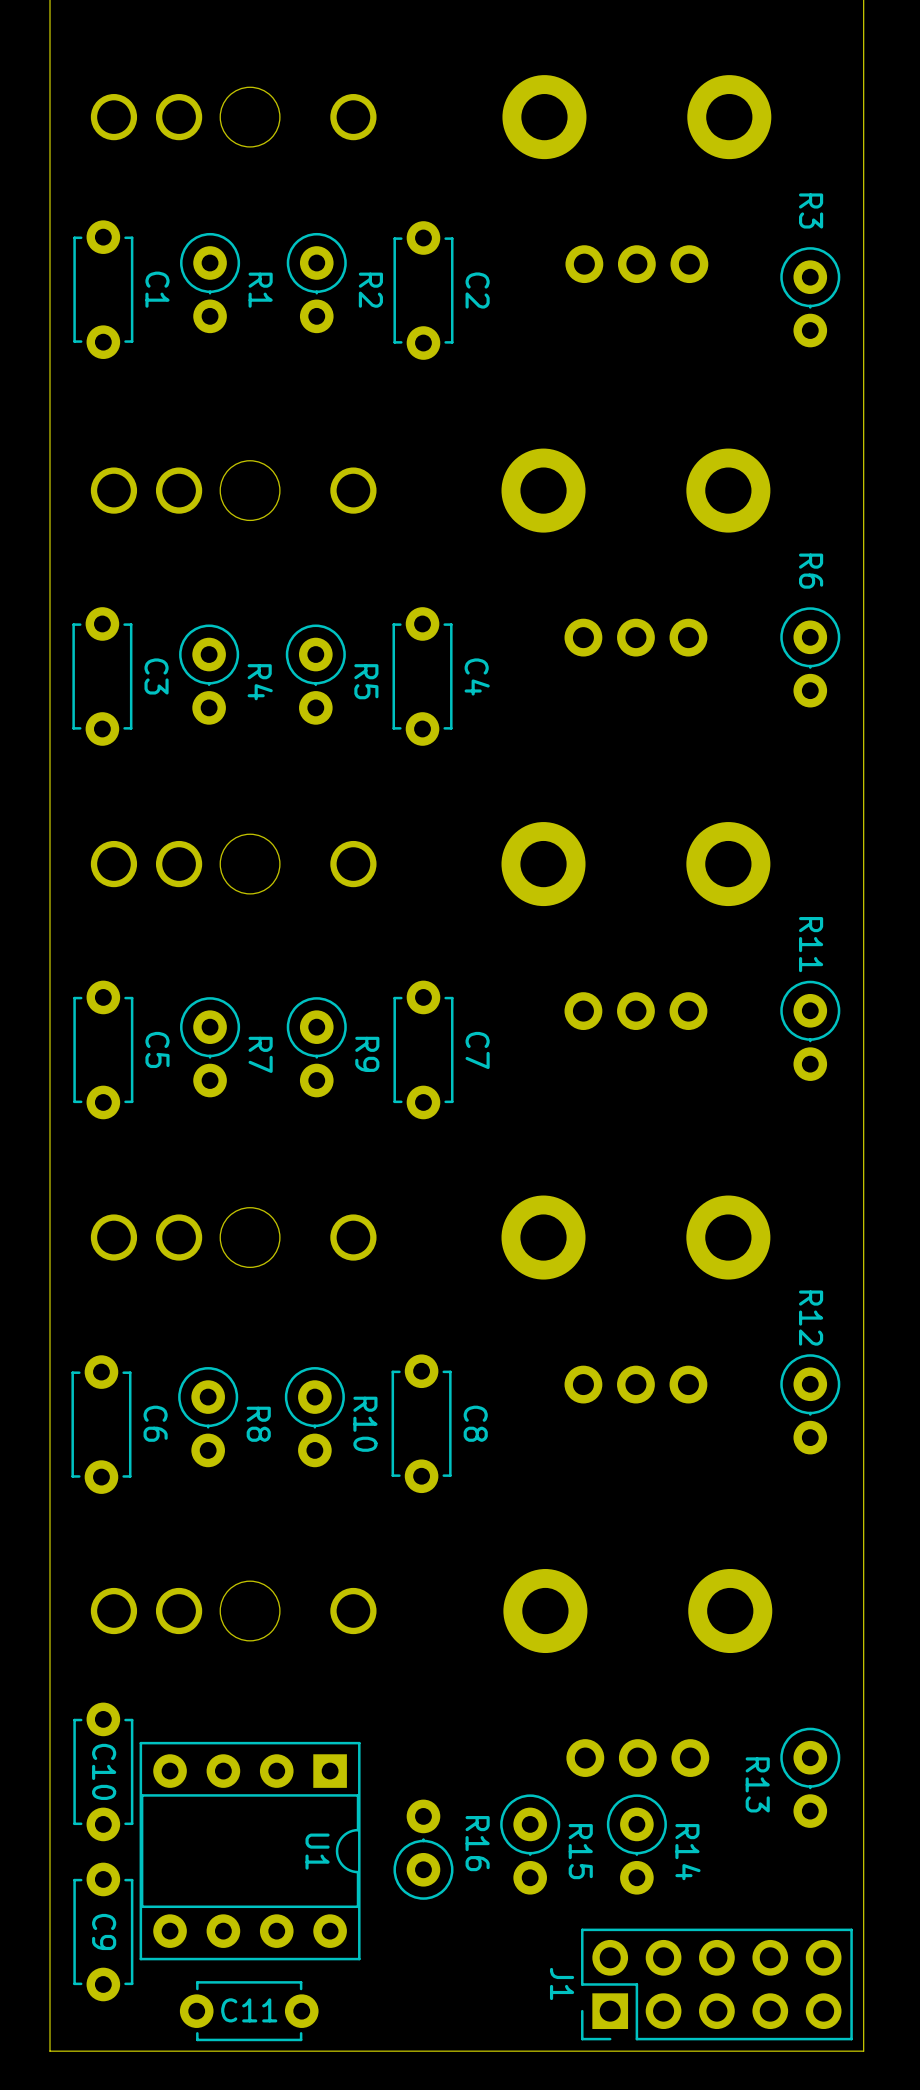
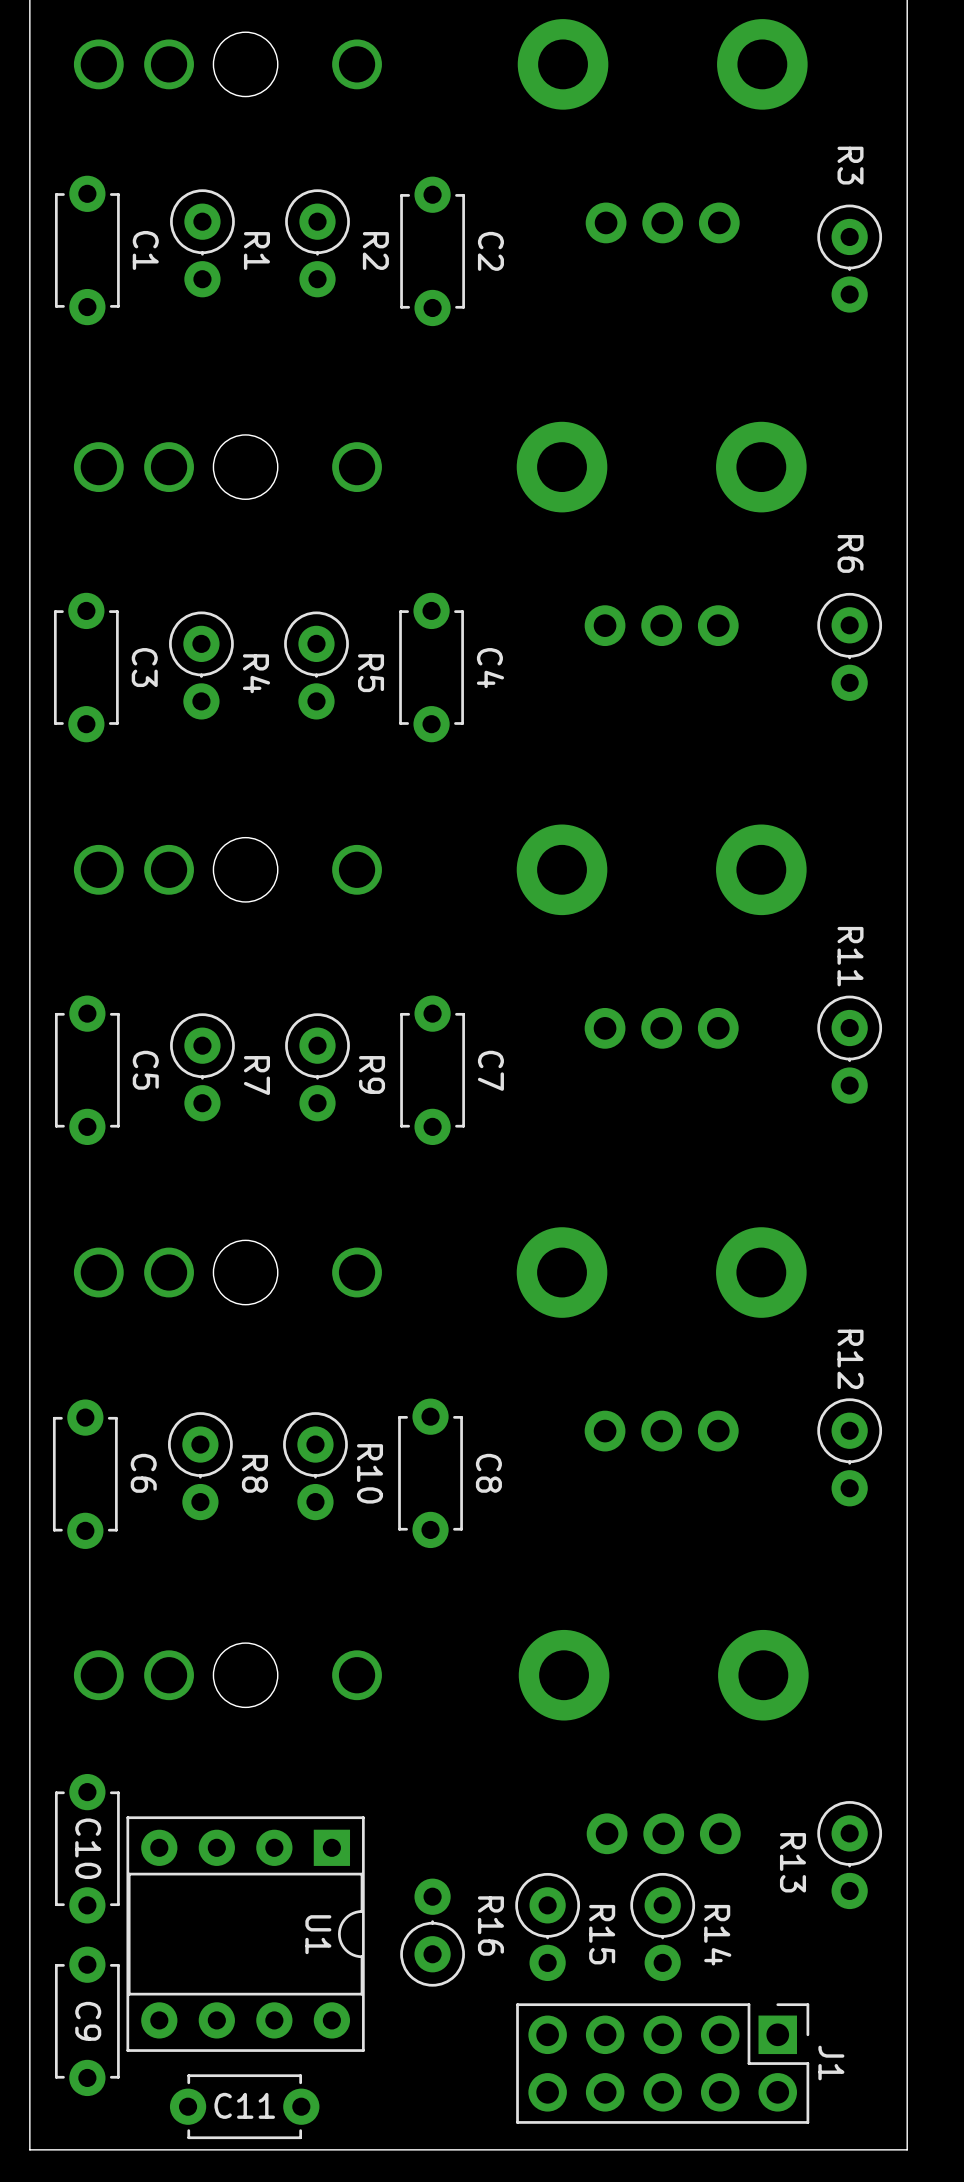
J1 rotation: 0° (716, 1984) -> 180° (662, 2063)

